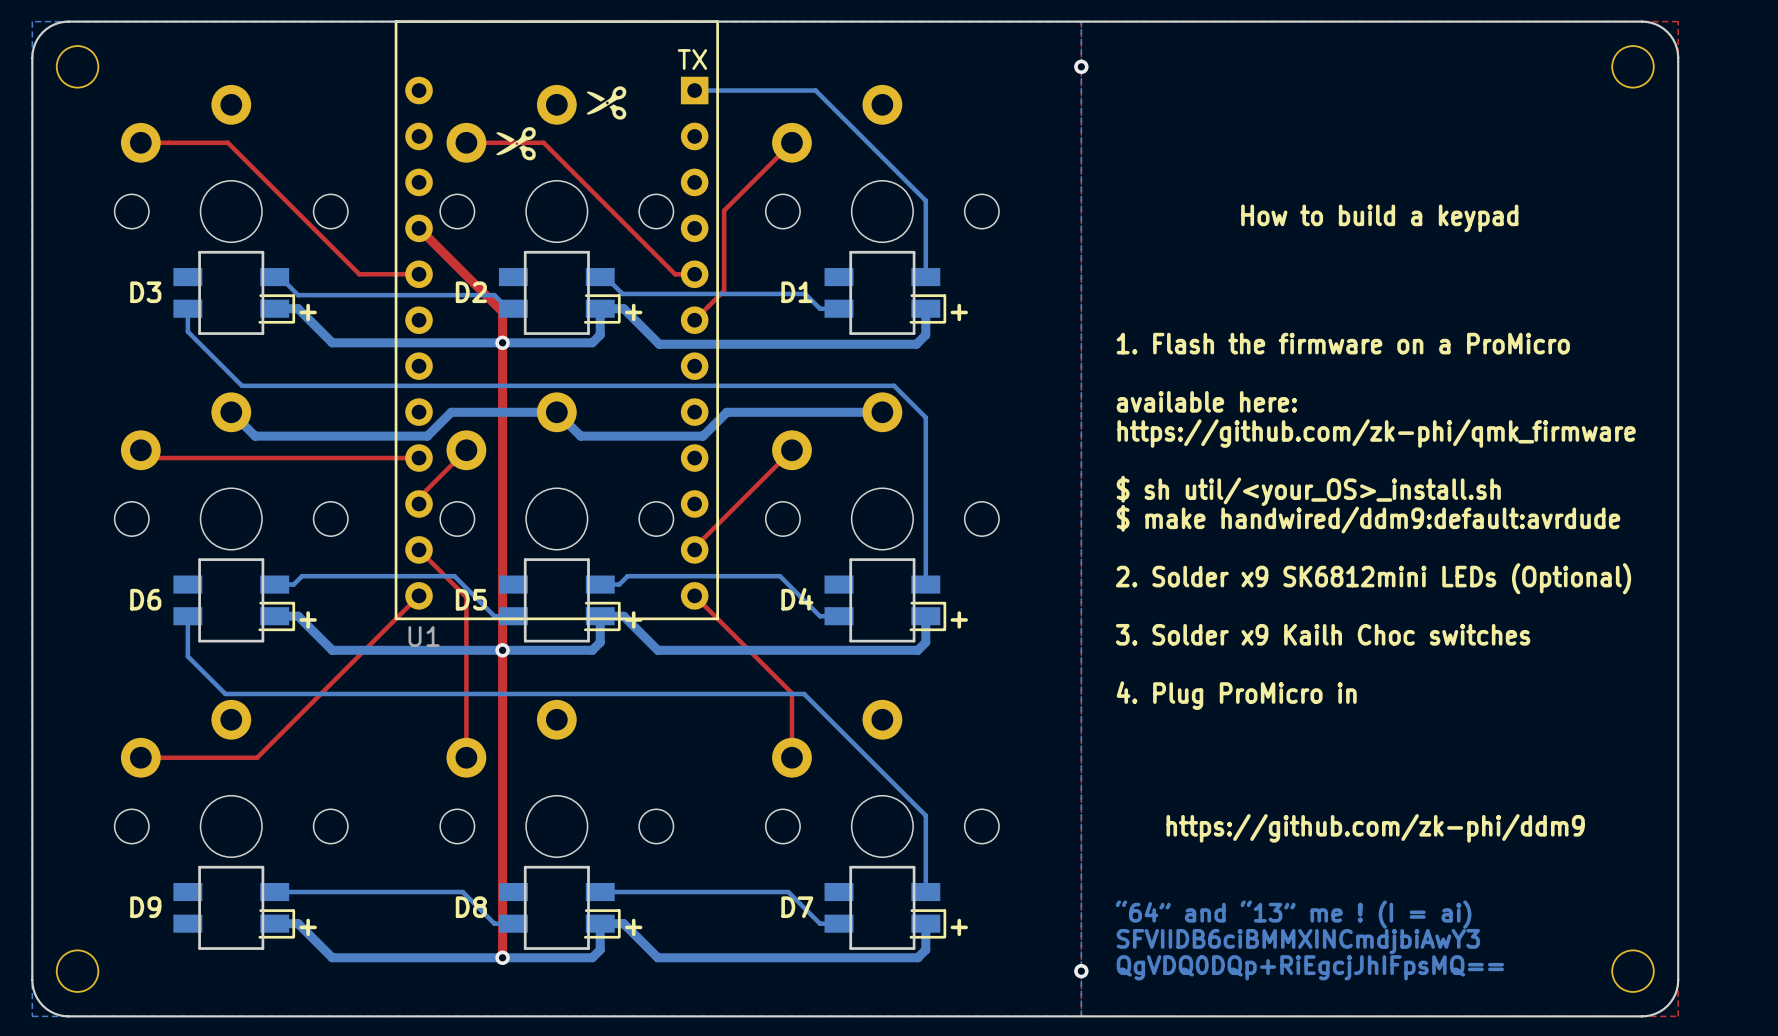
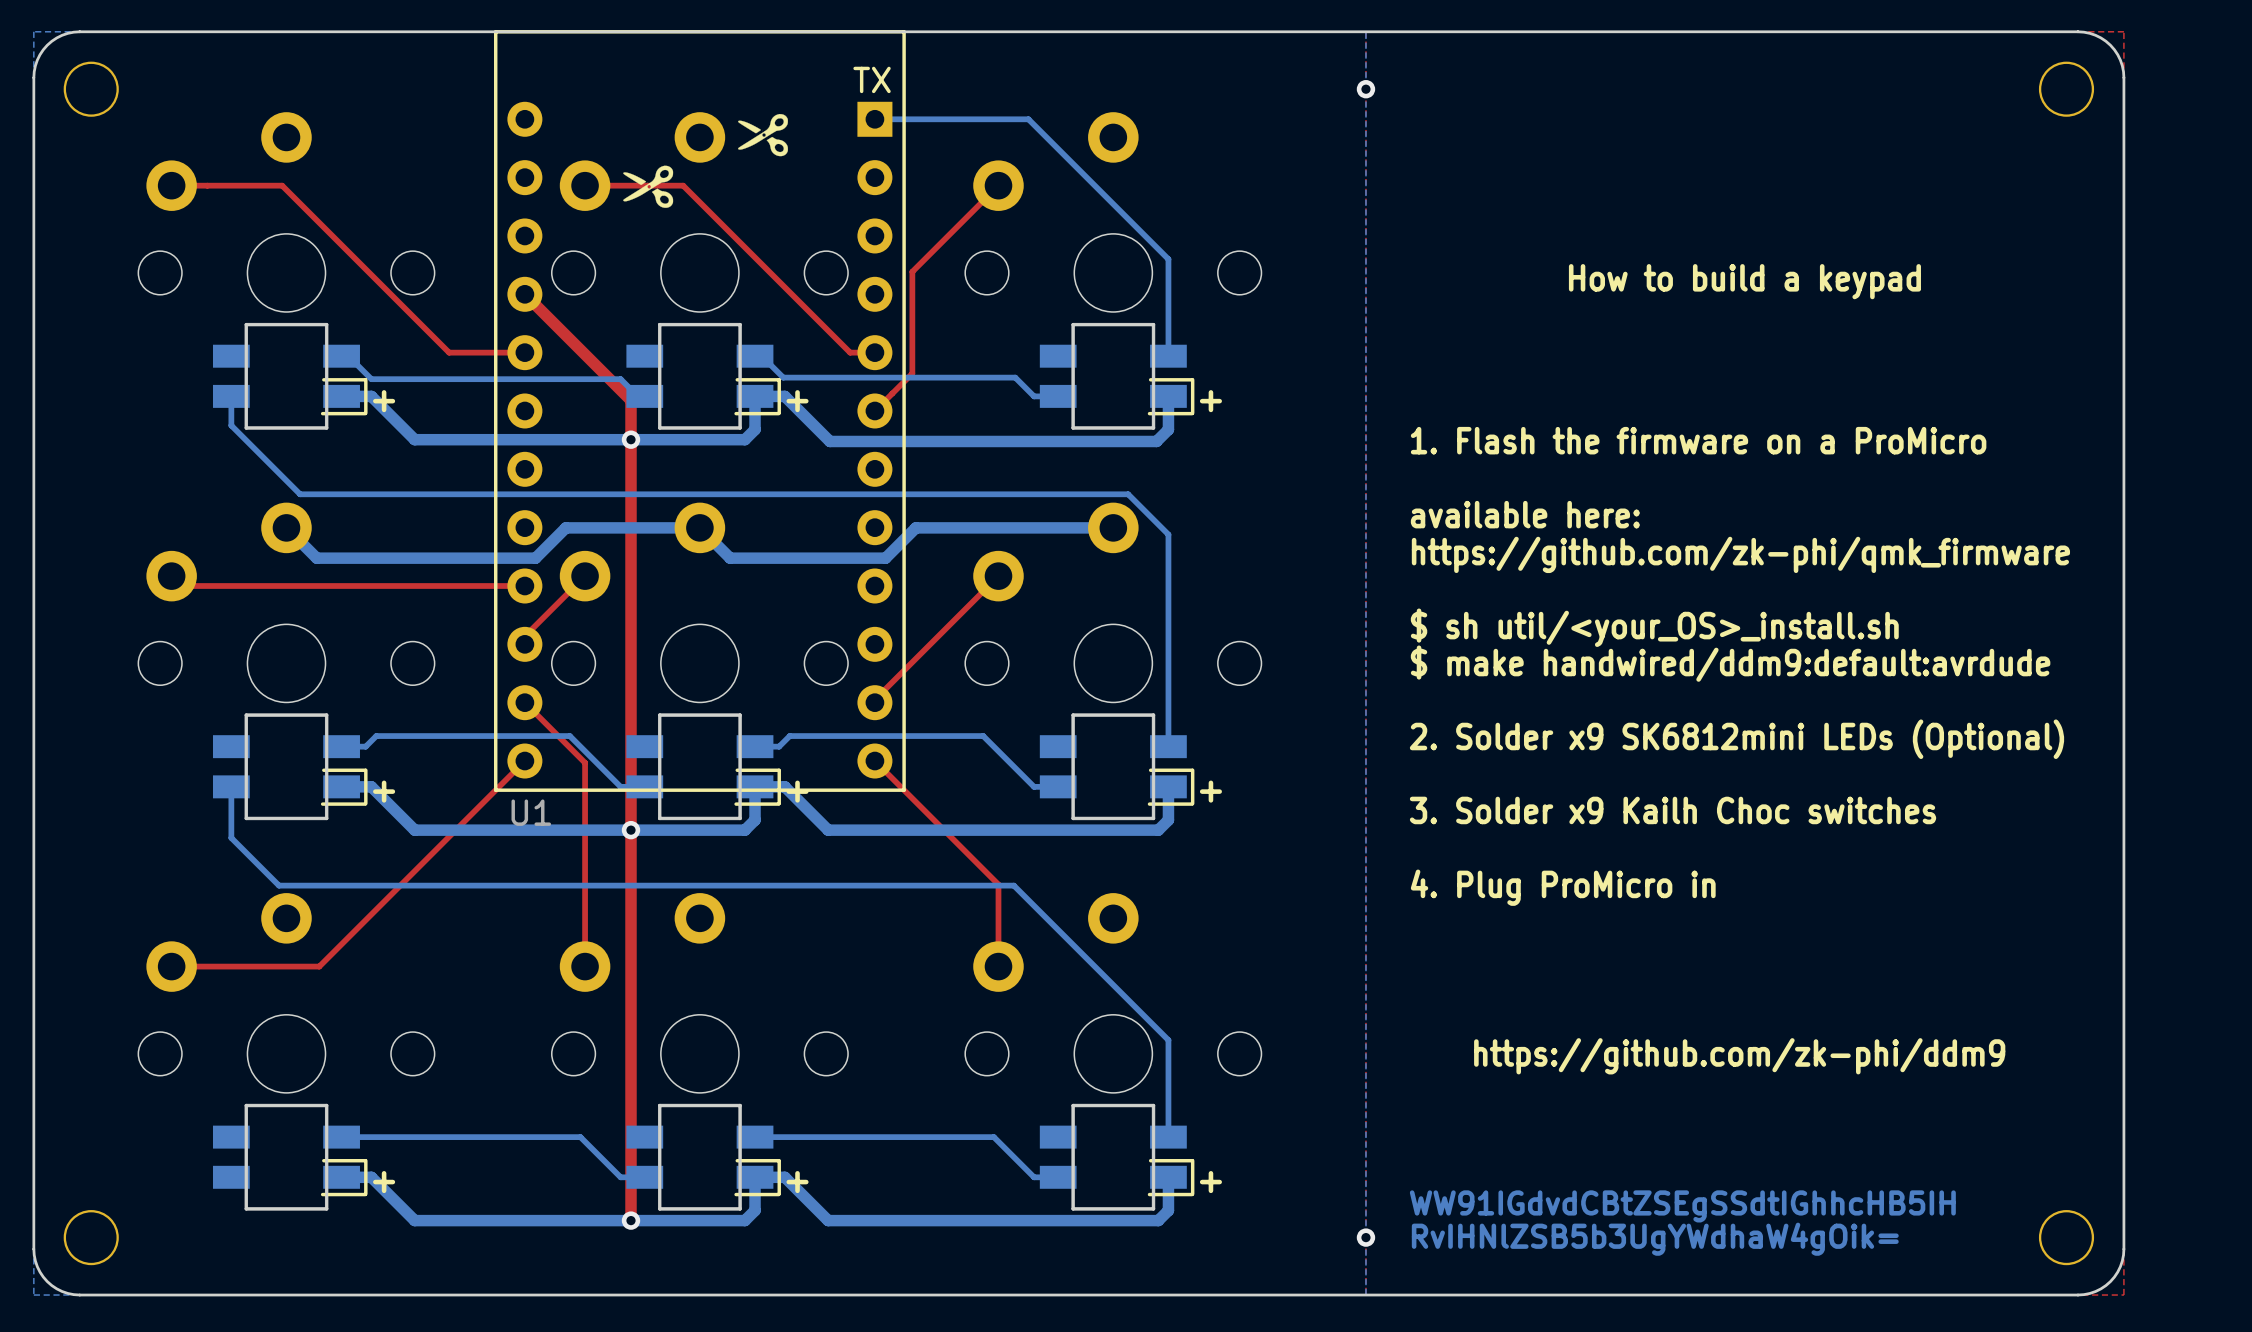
text: D3 (145, 292) -> none
text: D2 (471, 292) -> none
text: D1 (796, 292) -> none
text: D6 (145, 599) -> none
text: D5 (471, 599) -> none
text: D4 (797, 599) -> none
text: D9 (145, 907) -> none
text: D8 (471, 907) -> none
text: D7 (797, 907) -> none
text: “64” and “13” me ! (I = ai) (1293, 914) -> none
text: SFVIIDB6ciBMMXINCmdjbiAwY3 (1298, 941) -> WW91IGdvdCBtZSEgSSdtIGhhcHB5IH (1682, 1206)
text: QgVDQ0DQp+RiEgcjJhIFpsMQ== (1310, 967) -> RvIHNlZSB5b3UgYWdhaW4gOik= (1655, 1239)

